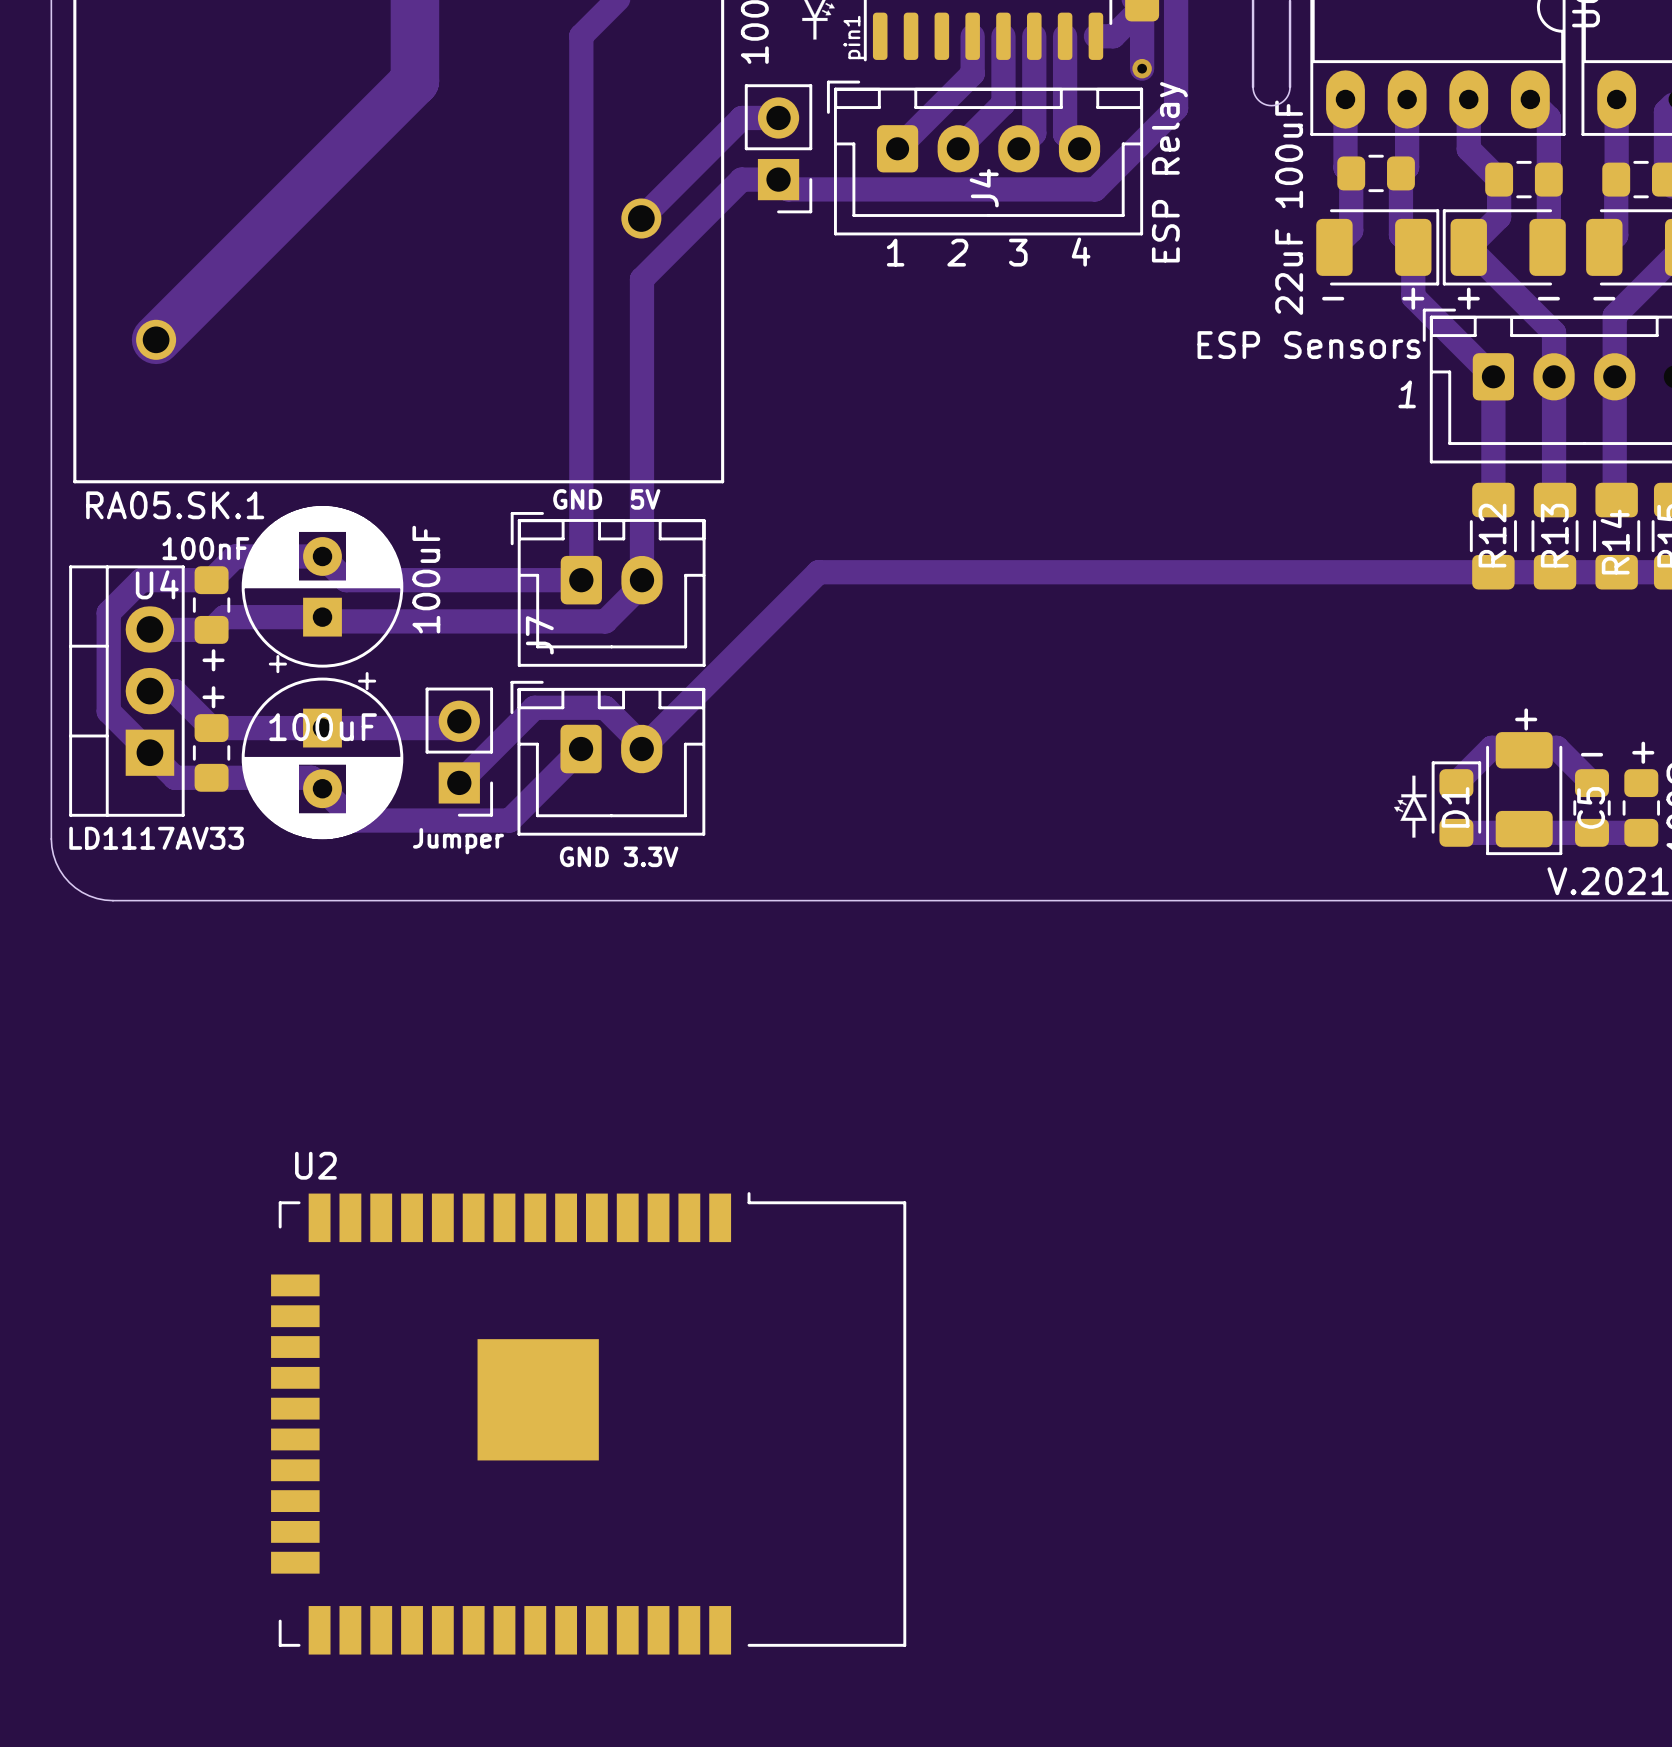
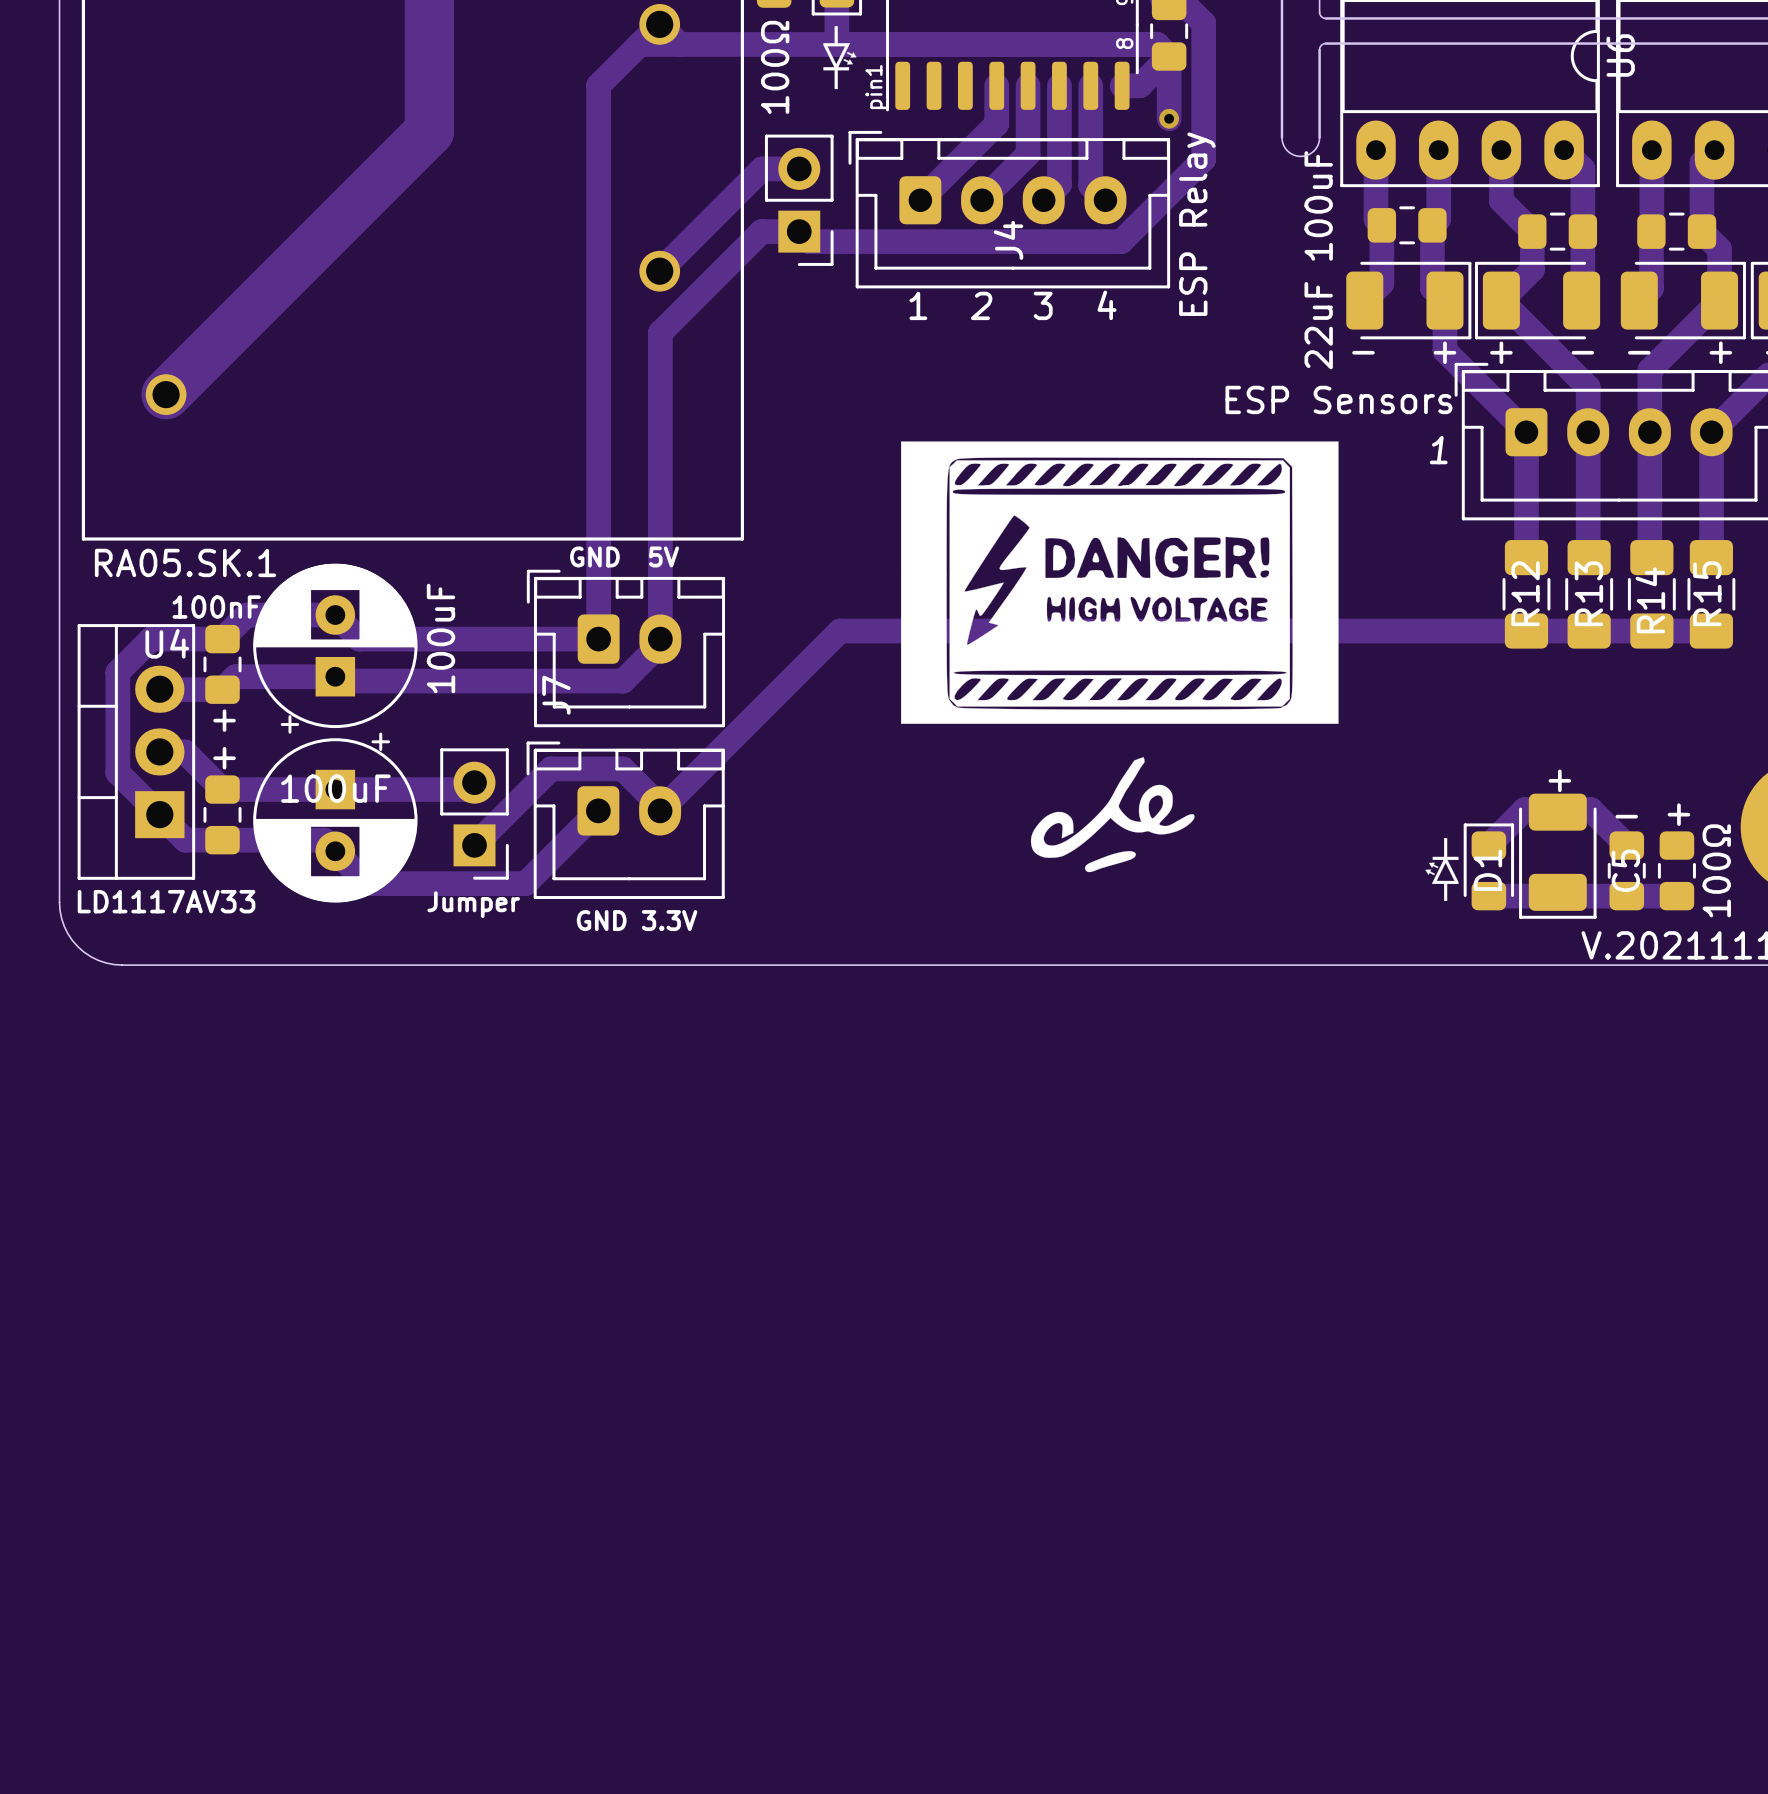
drawing: none -> [901, 441, 1339, 724]
drawing: none -> [1030, 757, 1195, 873]
U2: (588, 1423) -> none

